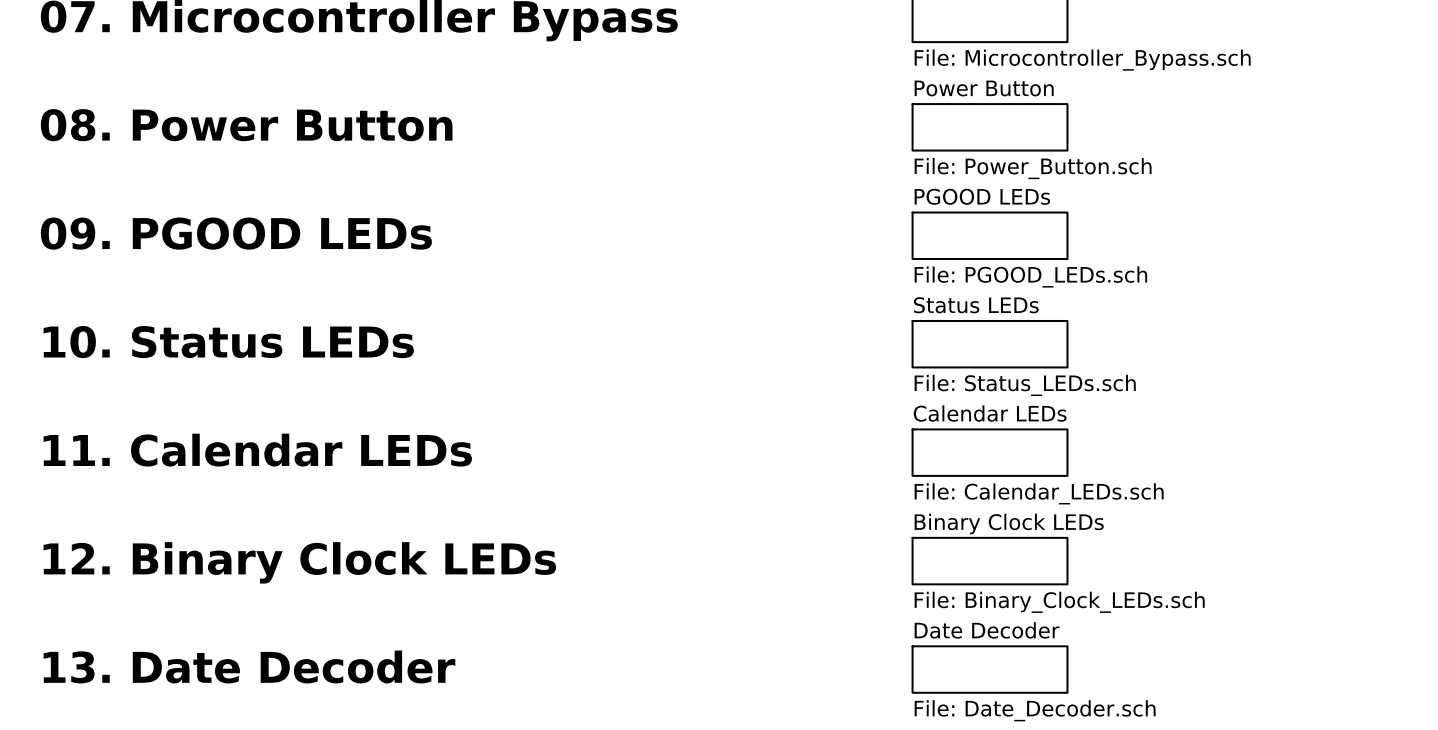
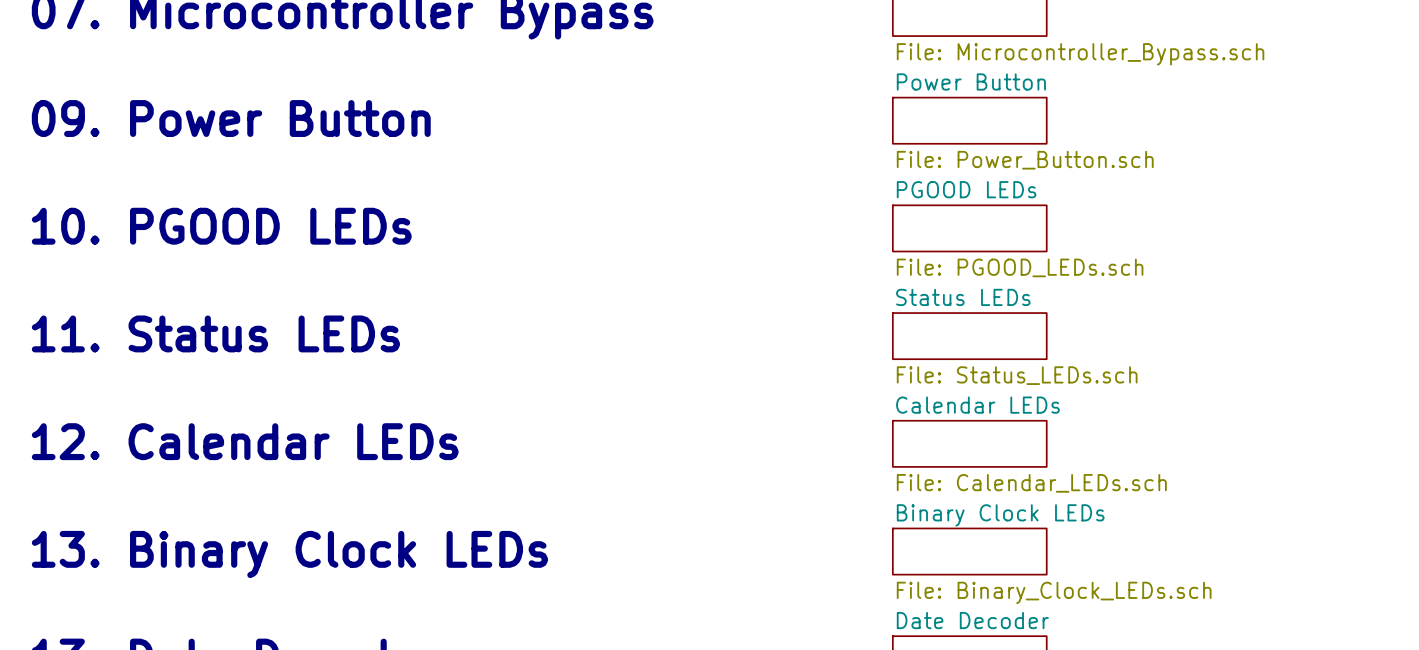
text: 08. Power Button (246, 125) -> 09. Power Button (231, 118)
text: 09. PGOOD LEDs (236, 233) -> 10. PGOOD LEDs (221, 226)
text: 10. Status LEDs (228, 342) -> 11. Status LEDs (215, 333)
text: 11. Calendar LEDs (257, 450) -> 12. Calendar LEDs (245, 441)
text: 12. Binary Clock LEDs (299, 562) -> 13. Binary Clock LEDs (289, 554)

